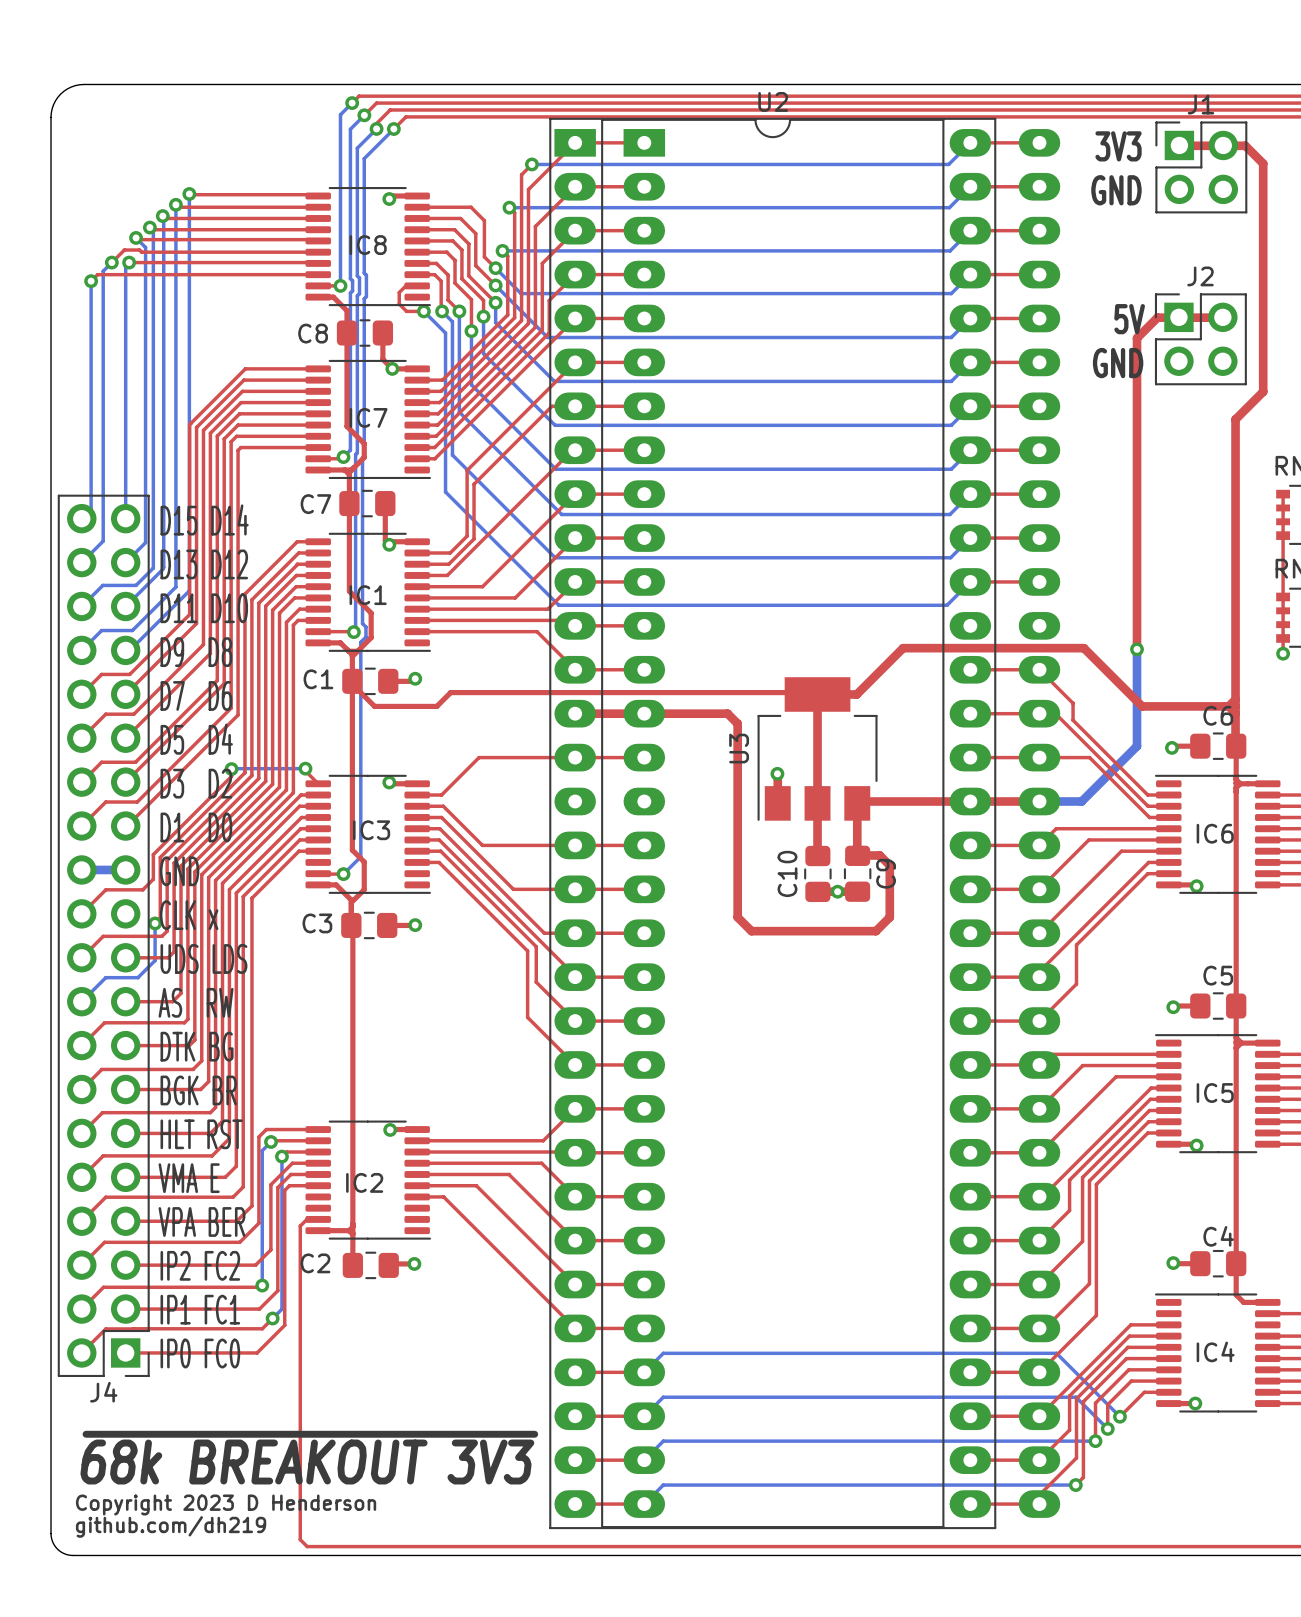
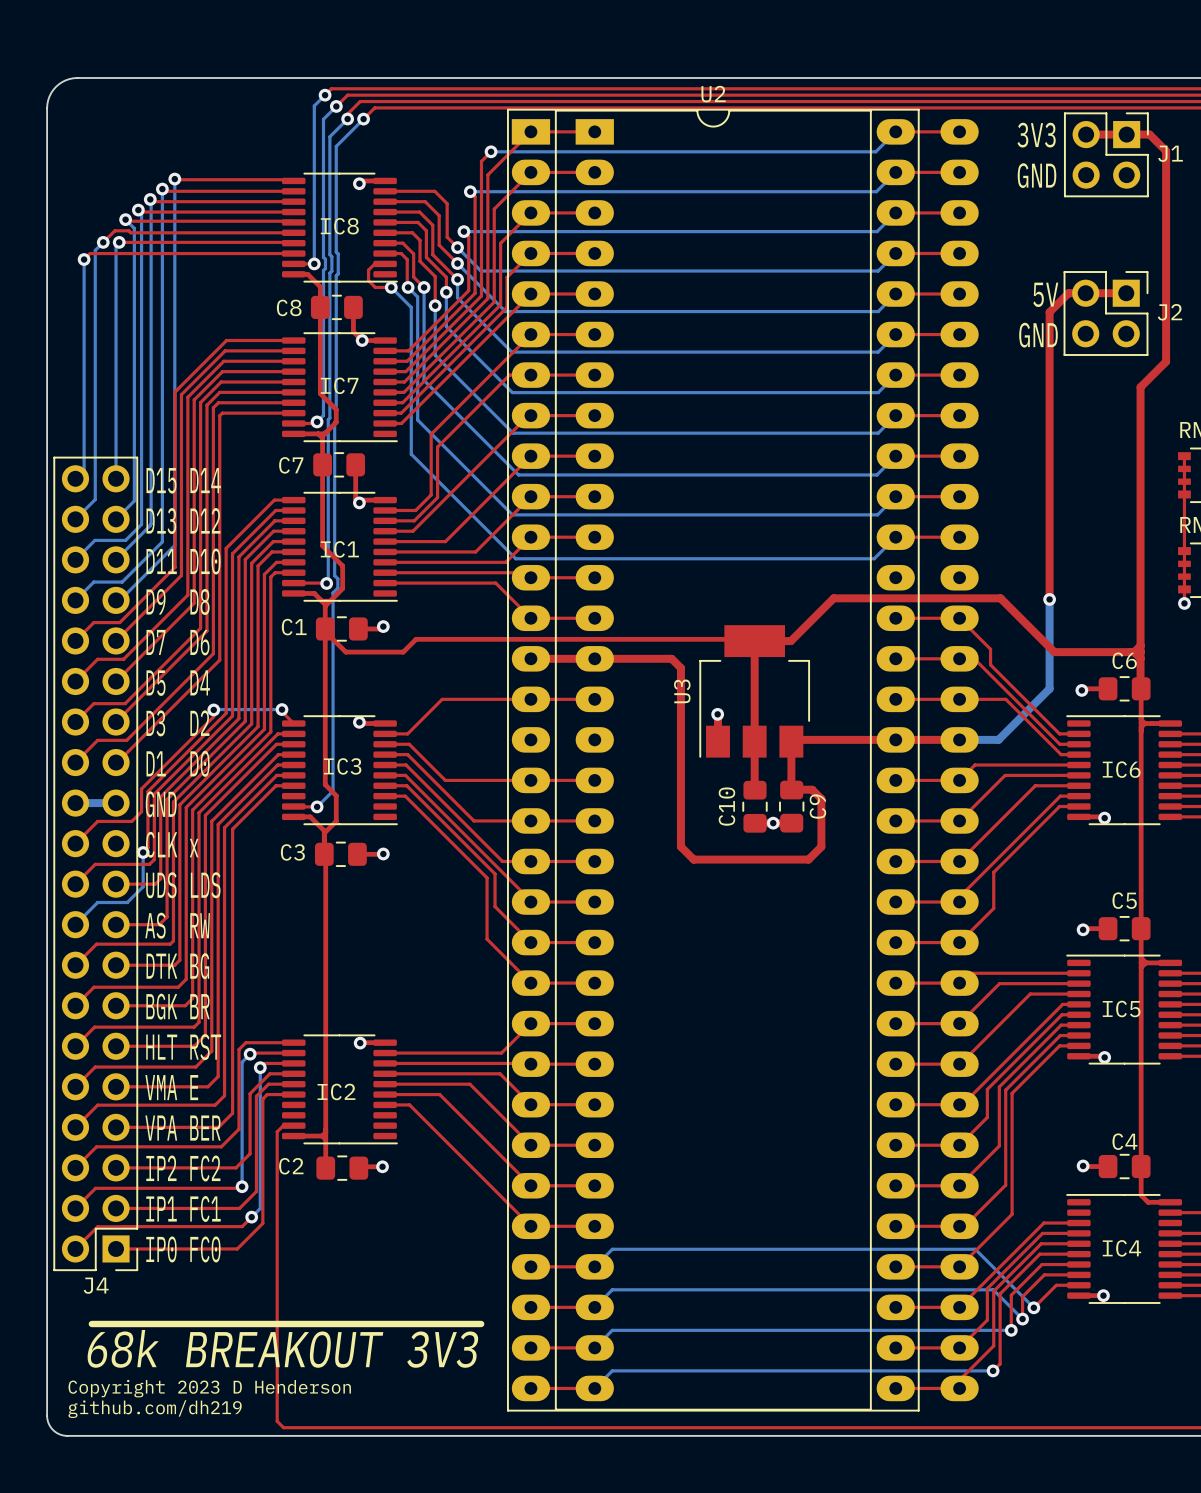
J1 rotation: 0° (1201, 167) -> 90° clockwise (1106, 154)
J2 rotation: 0° (1200, 339) -> 90° clockwise (1105, 313)

